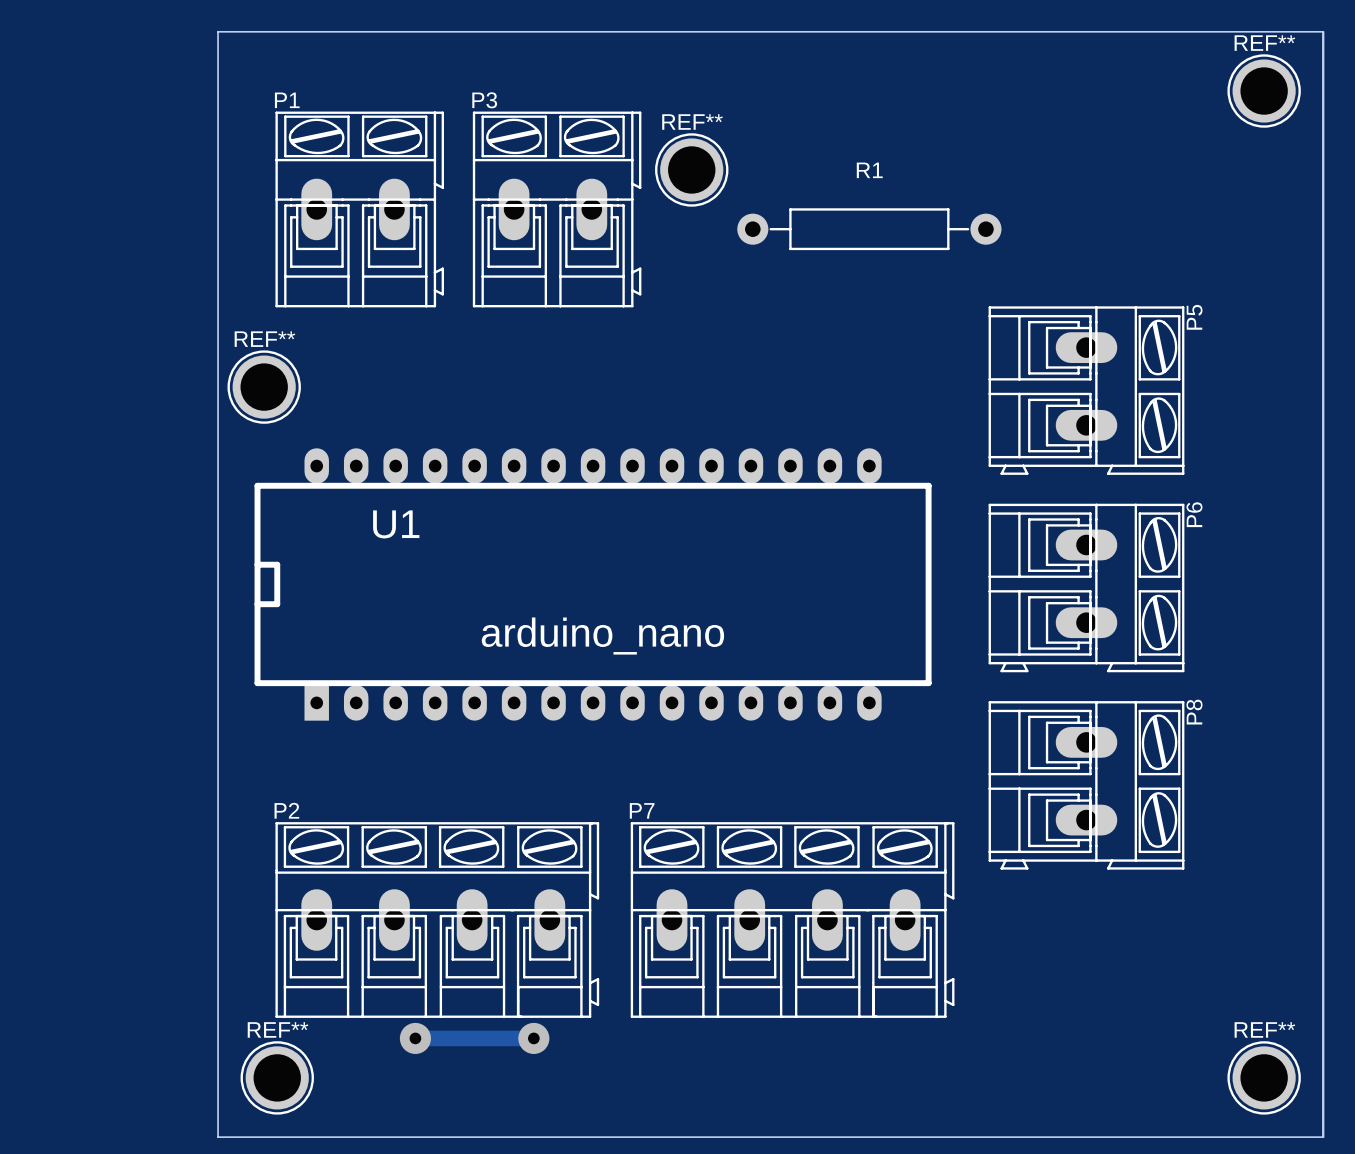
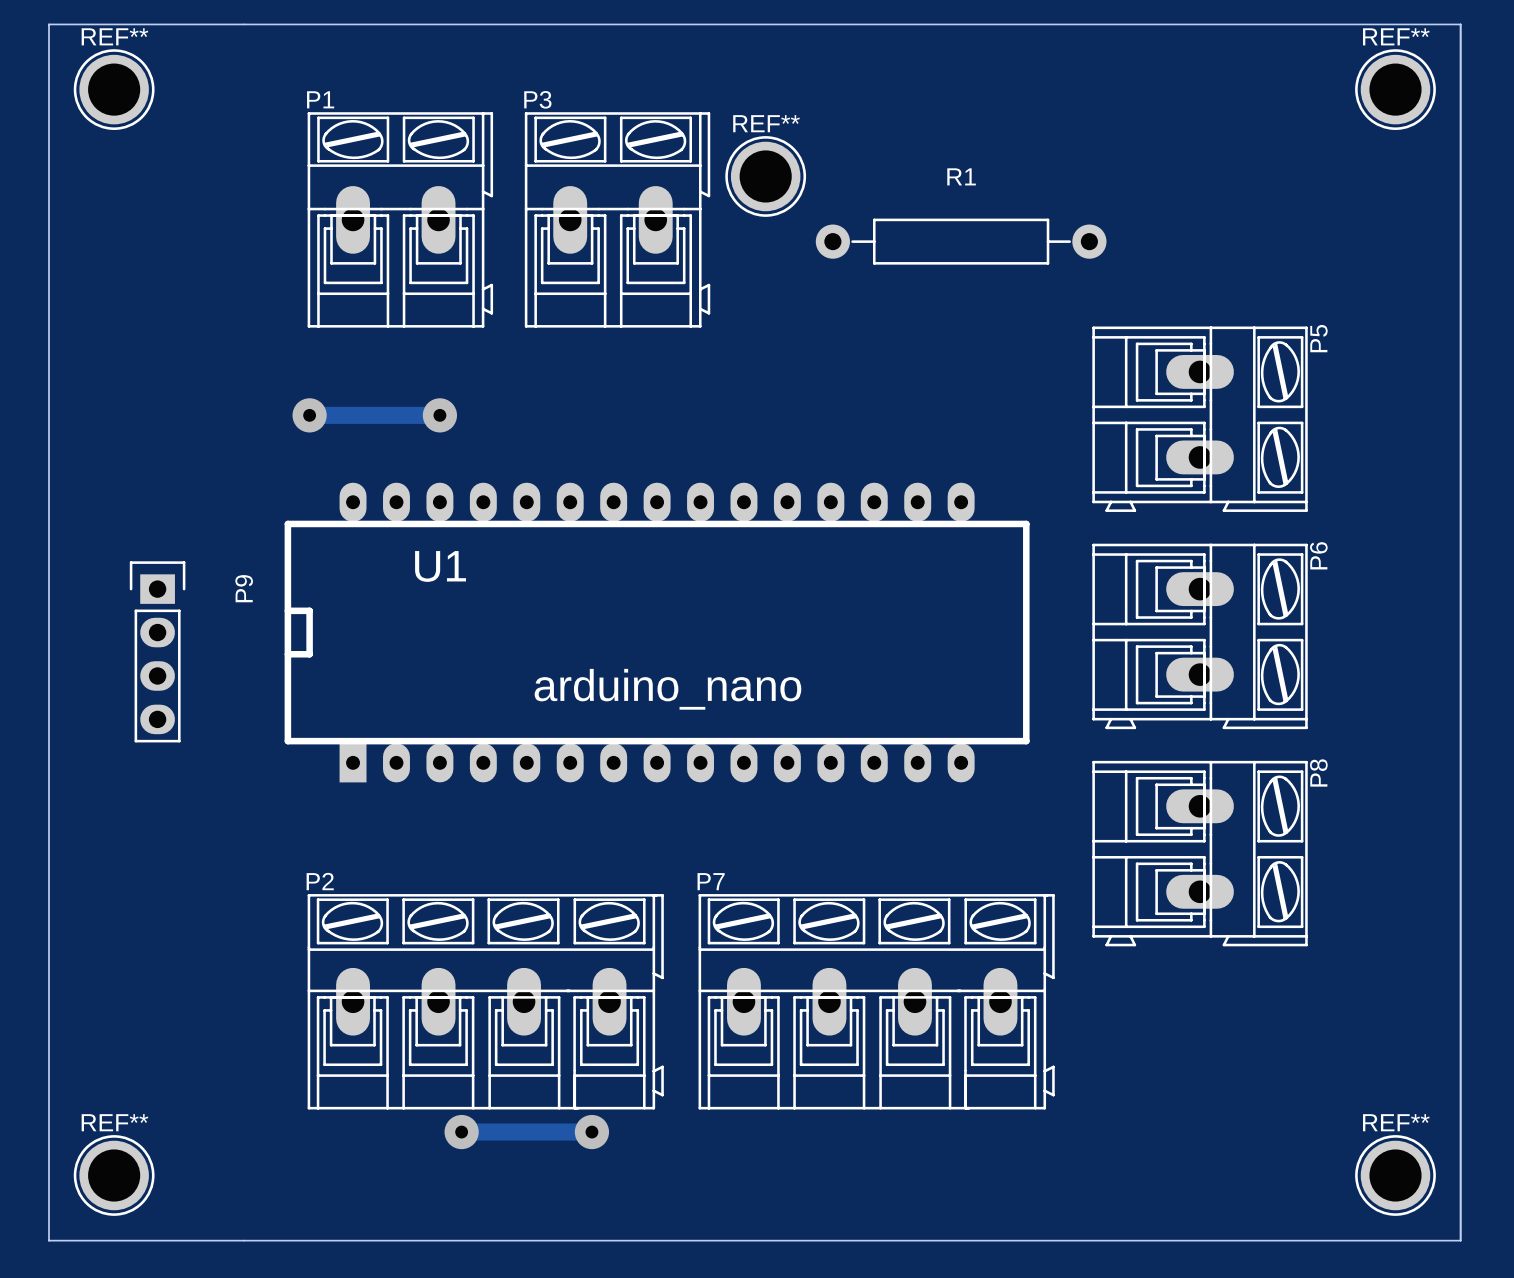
board edge: (218, 31) (218, 1137) -> (244, 24) (48, 24) (48, 1240) (244, 1240)
REF** position: (264, 387) -> (114, 89)
track: none -> (309, 415) (439, 415)
via: none -> (309, 415)
via: none -> (439, 415)
P9: none -> (157, 651)
REF** position: (277, 1077) -> (114, 1175)

